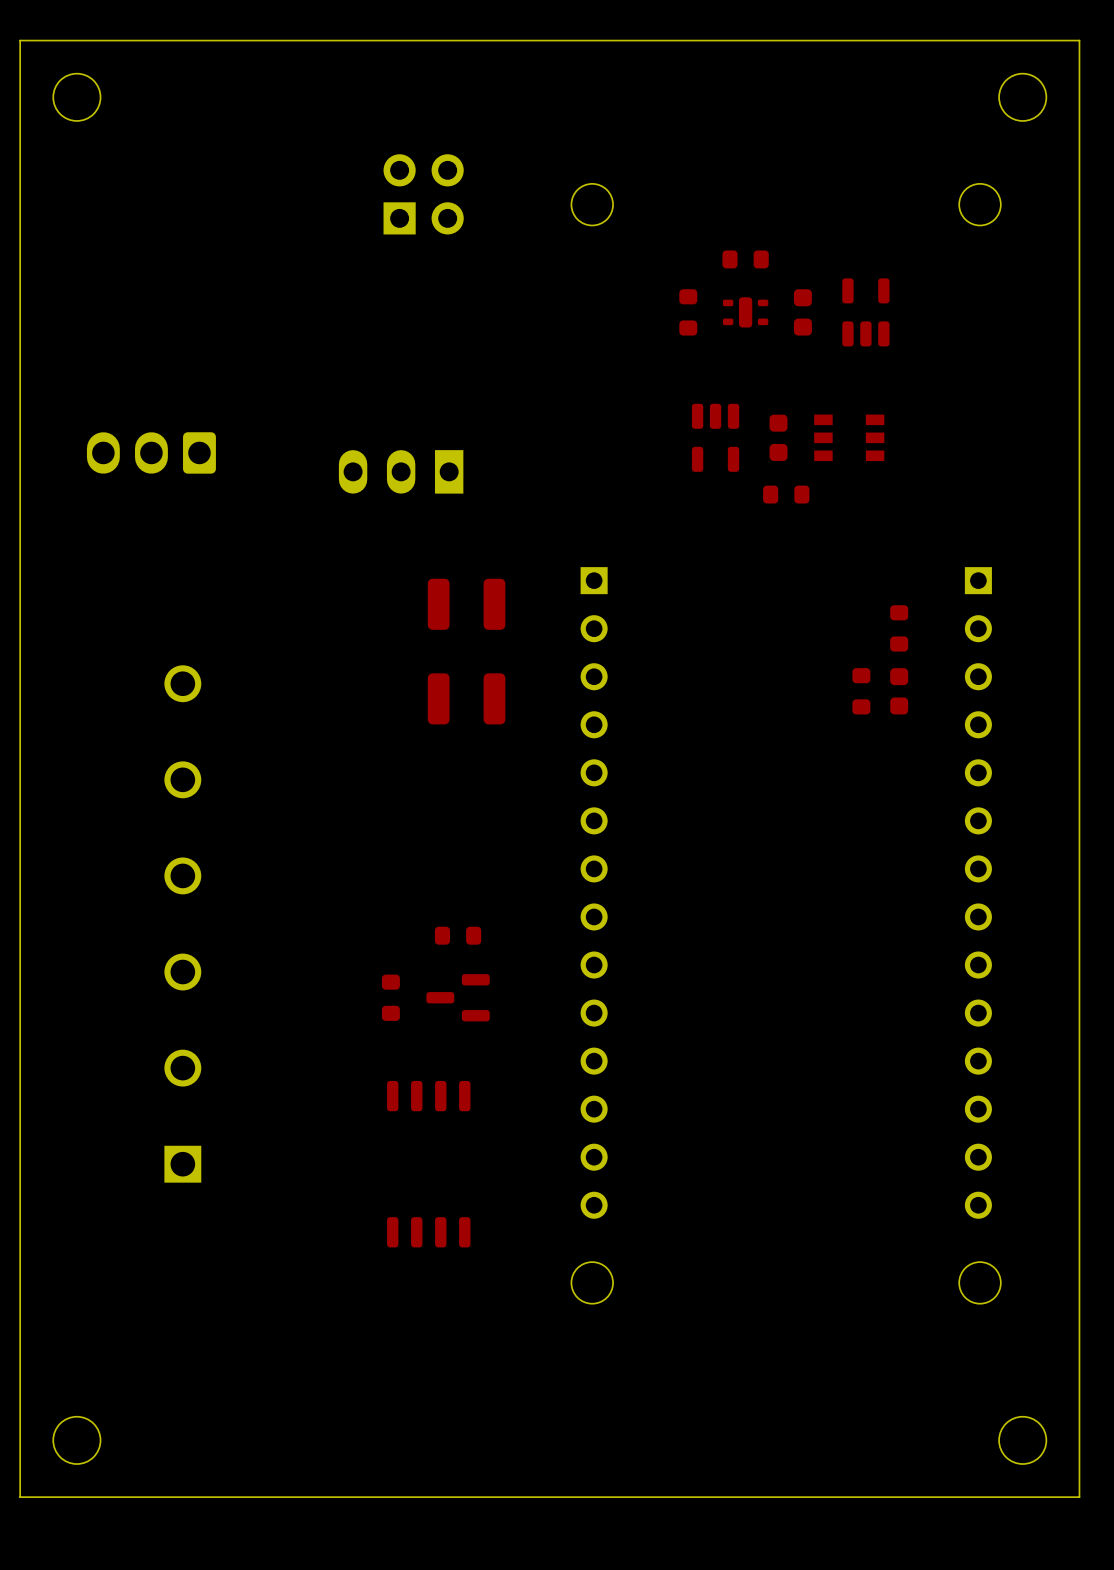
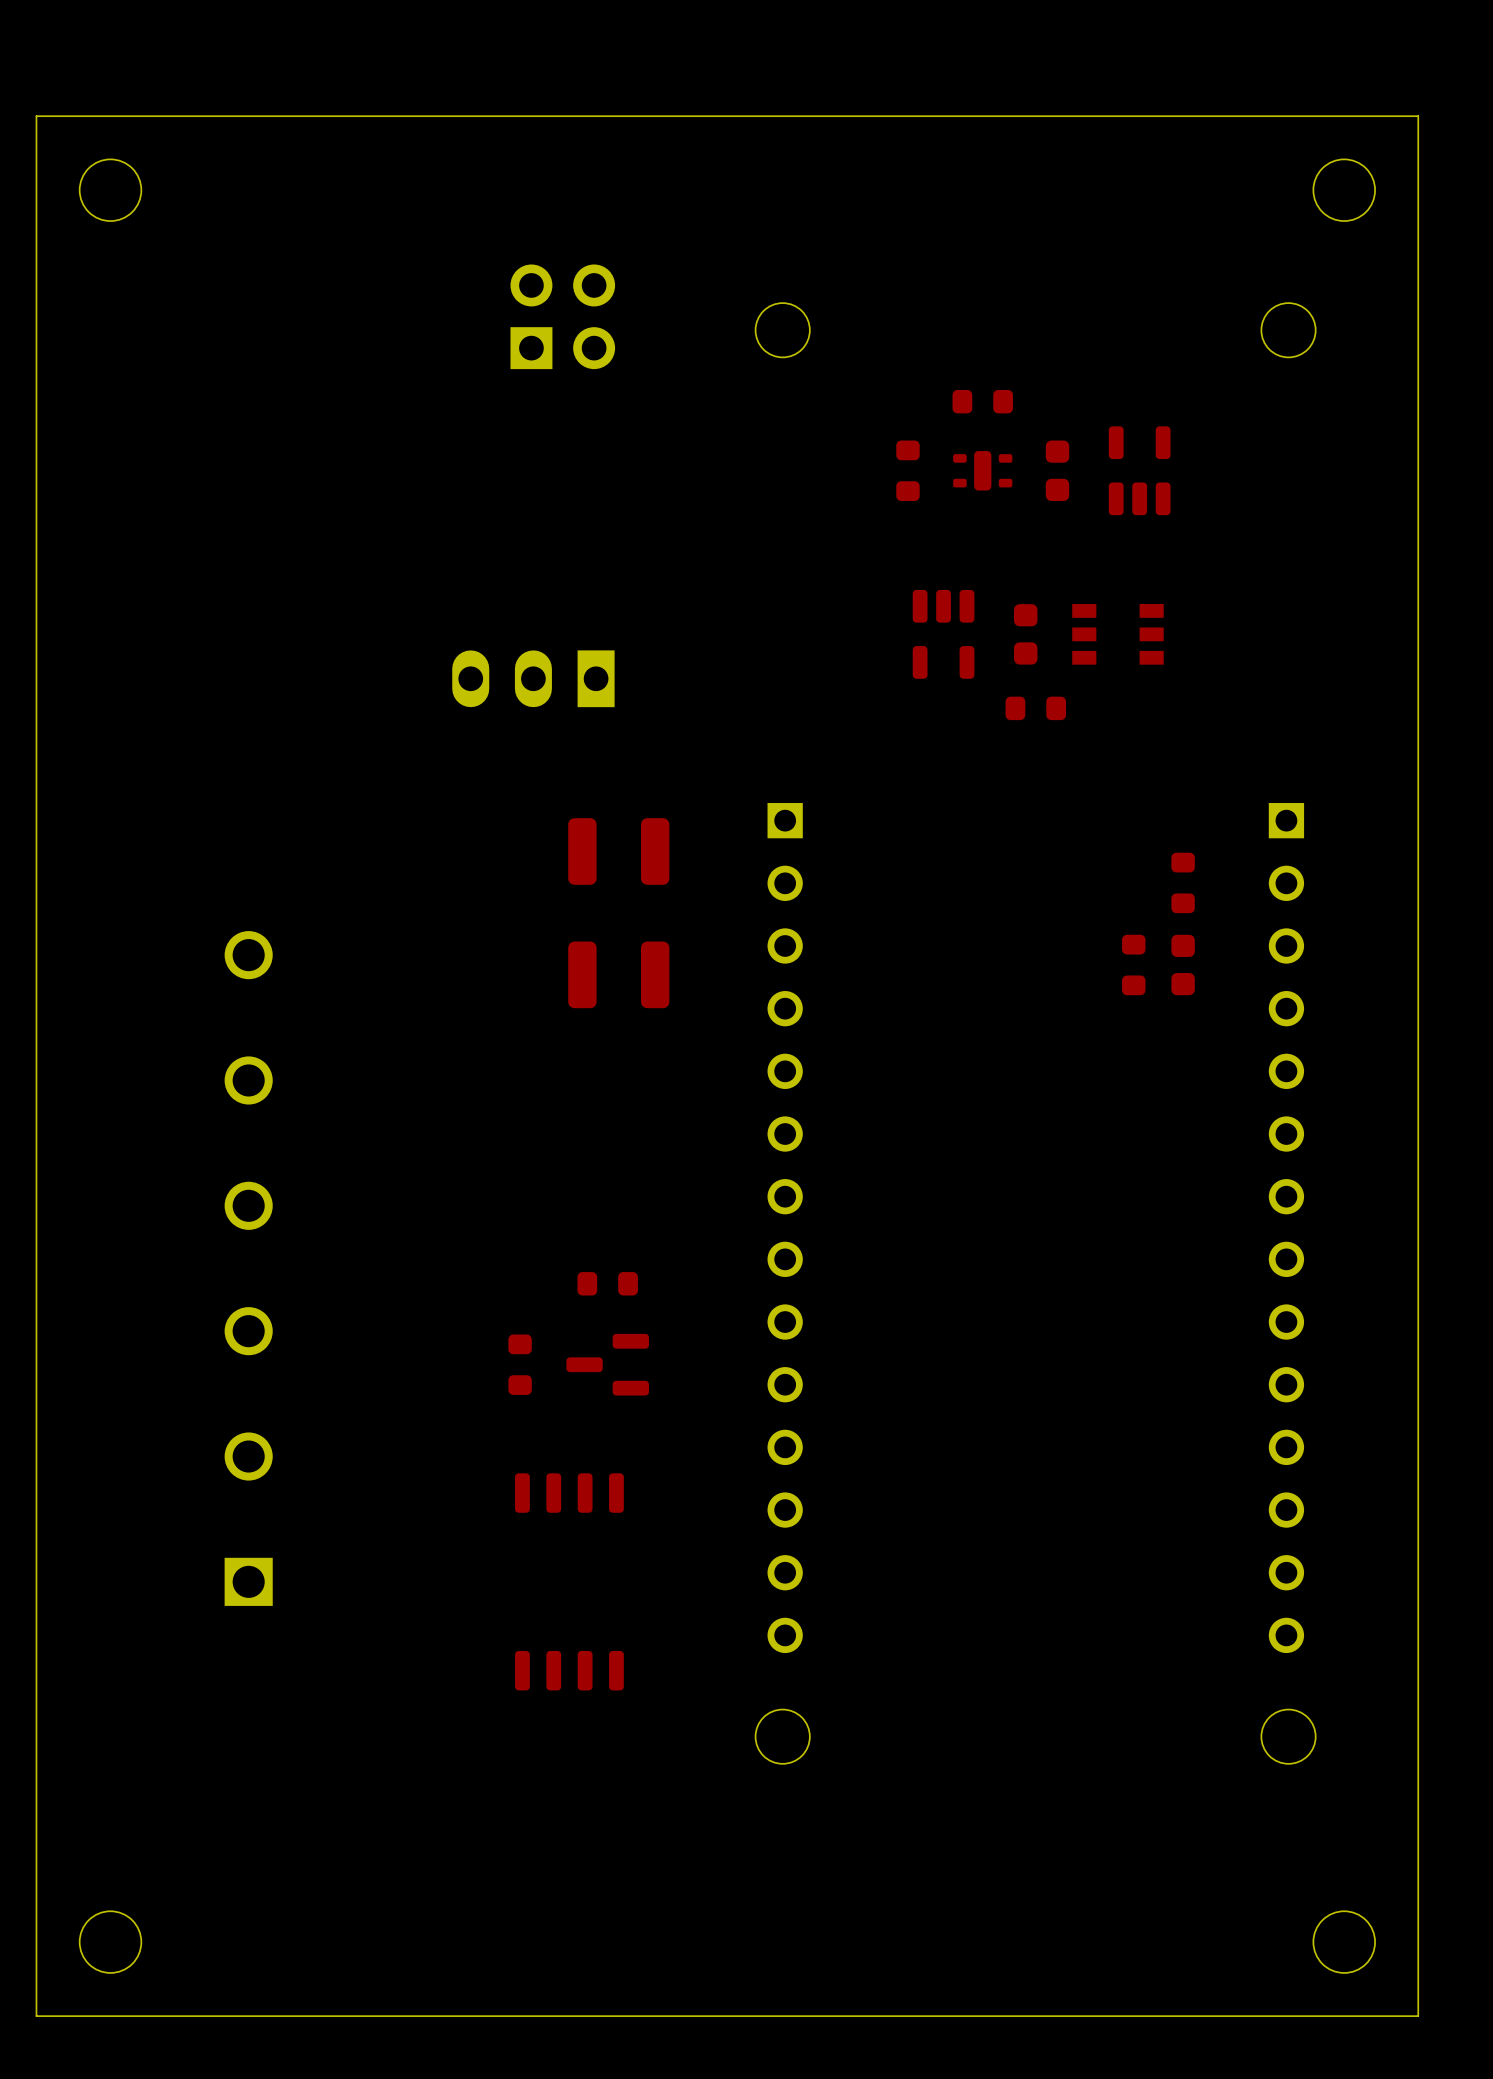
part: (151, 452) -> none

